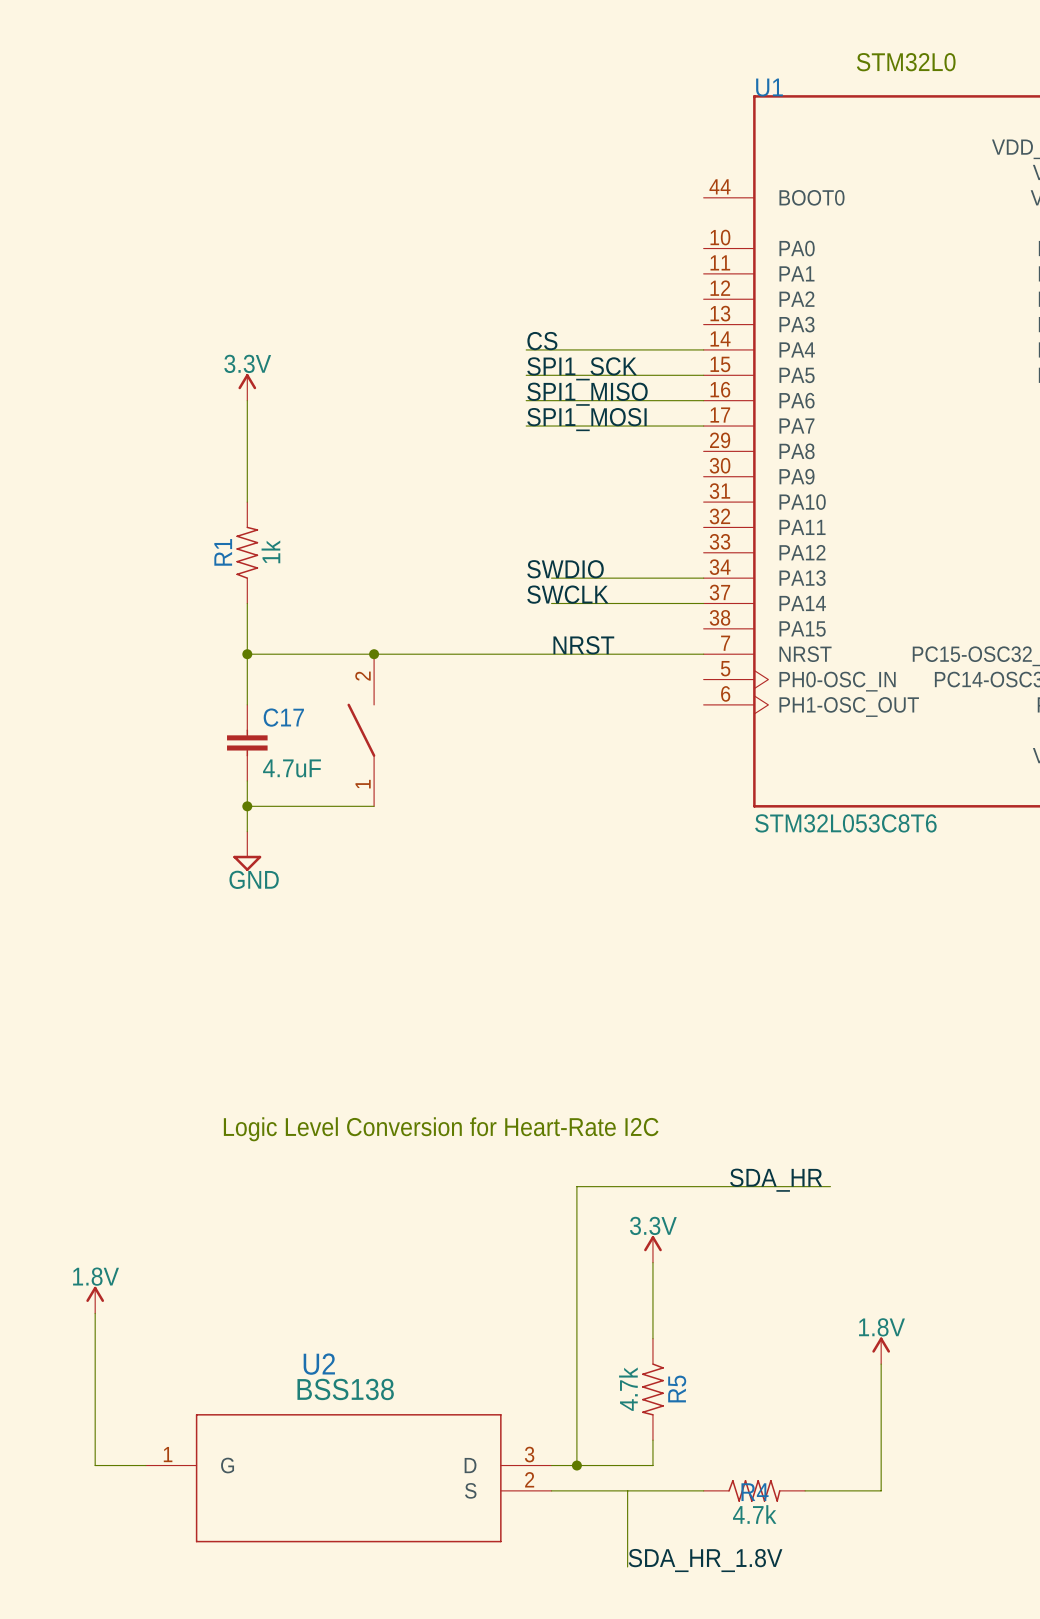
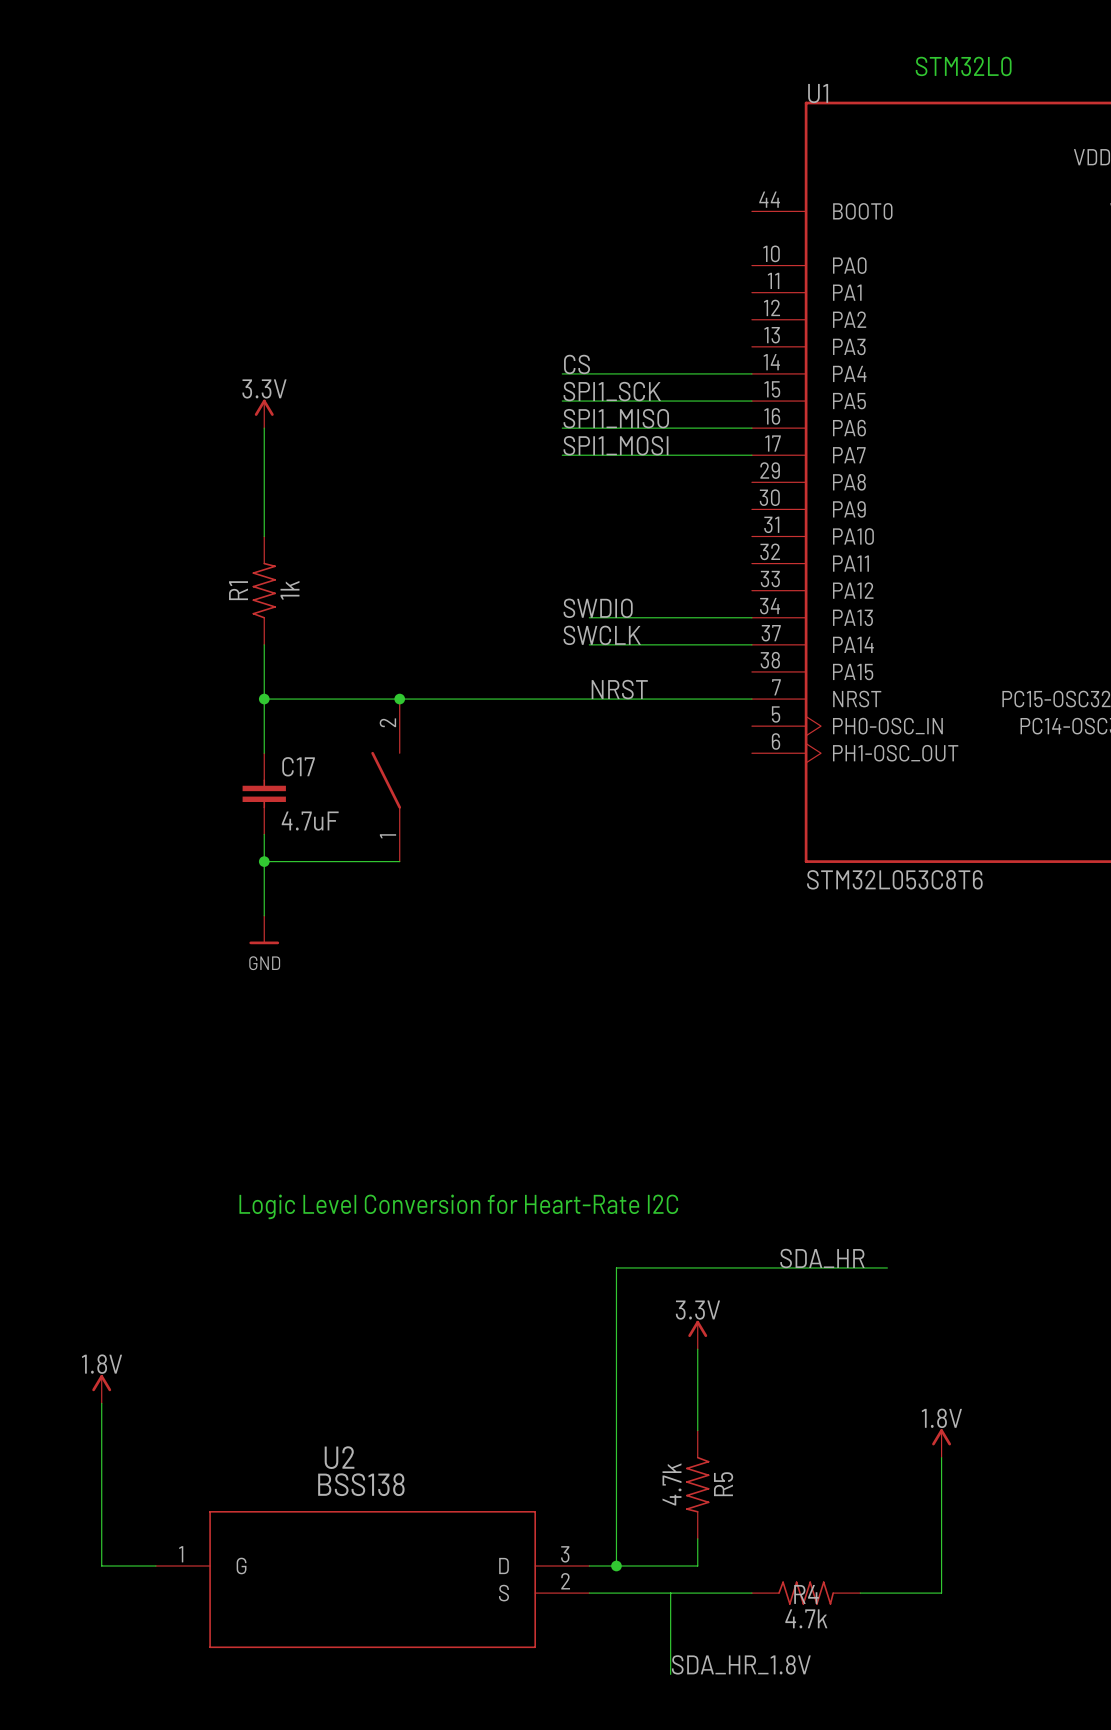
power symbol: GND (247, 851) -> none
power symbol: none -> GND (264, 930)

